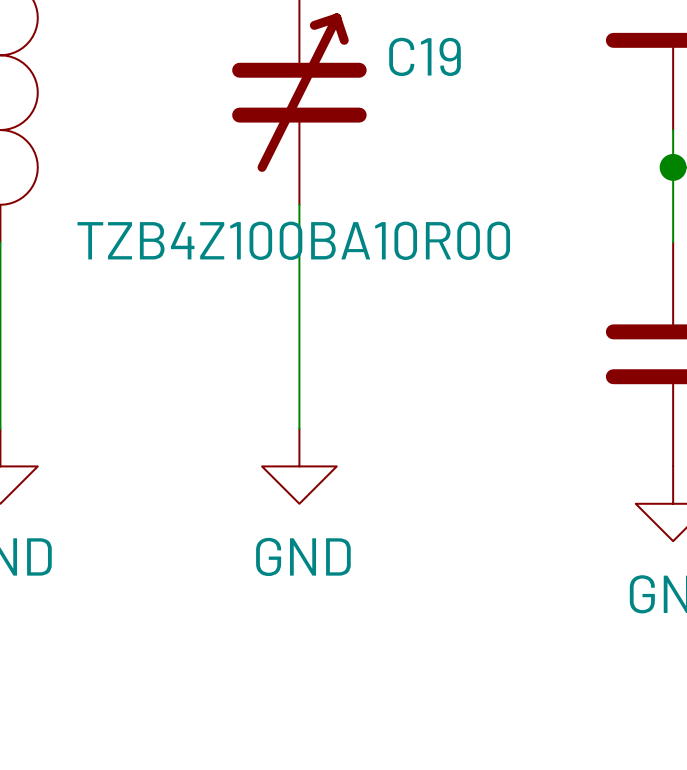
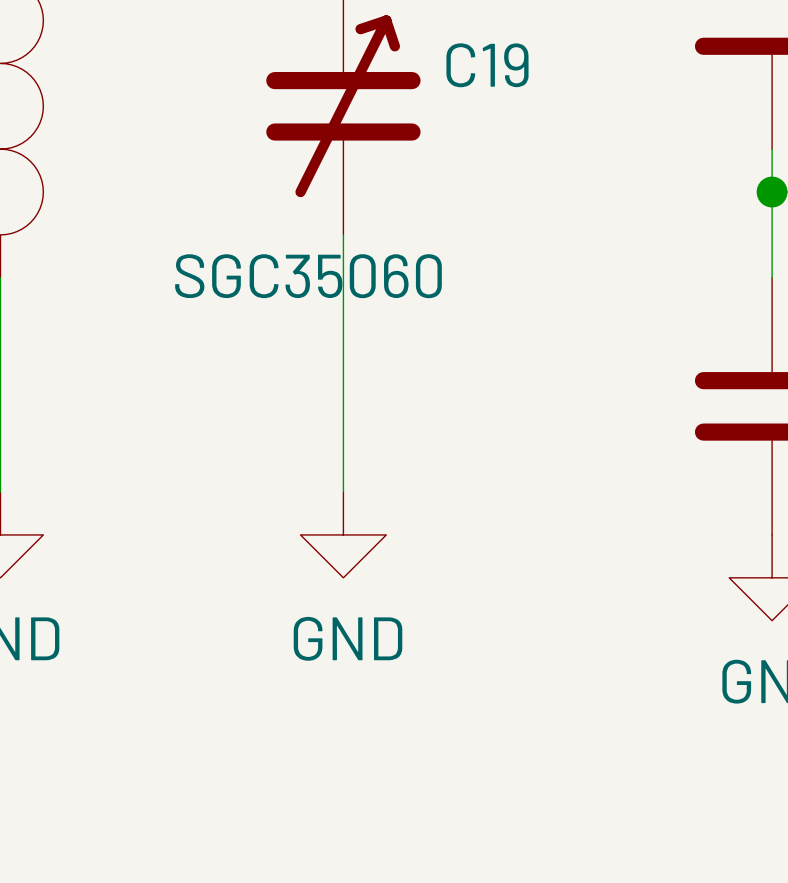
C19 value: TZB4Z100BA10R00 (293, 240) -> SGC35060 (308, 276)

